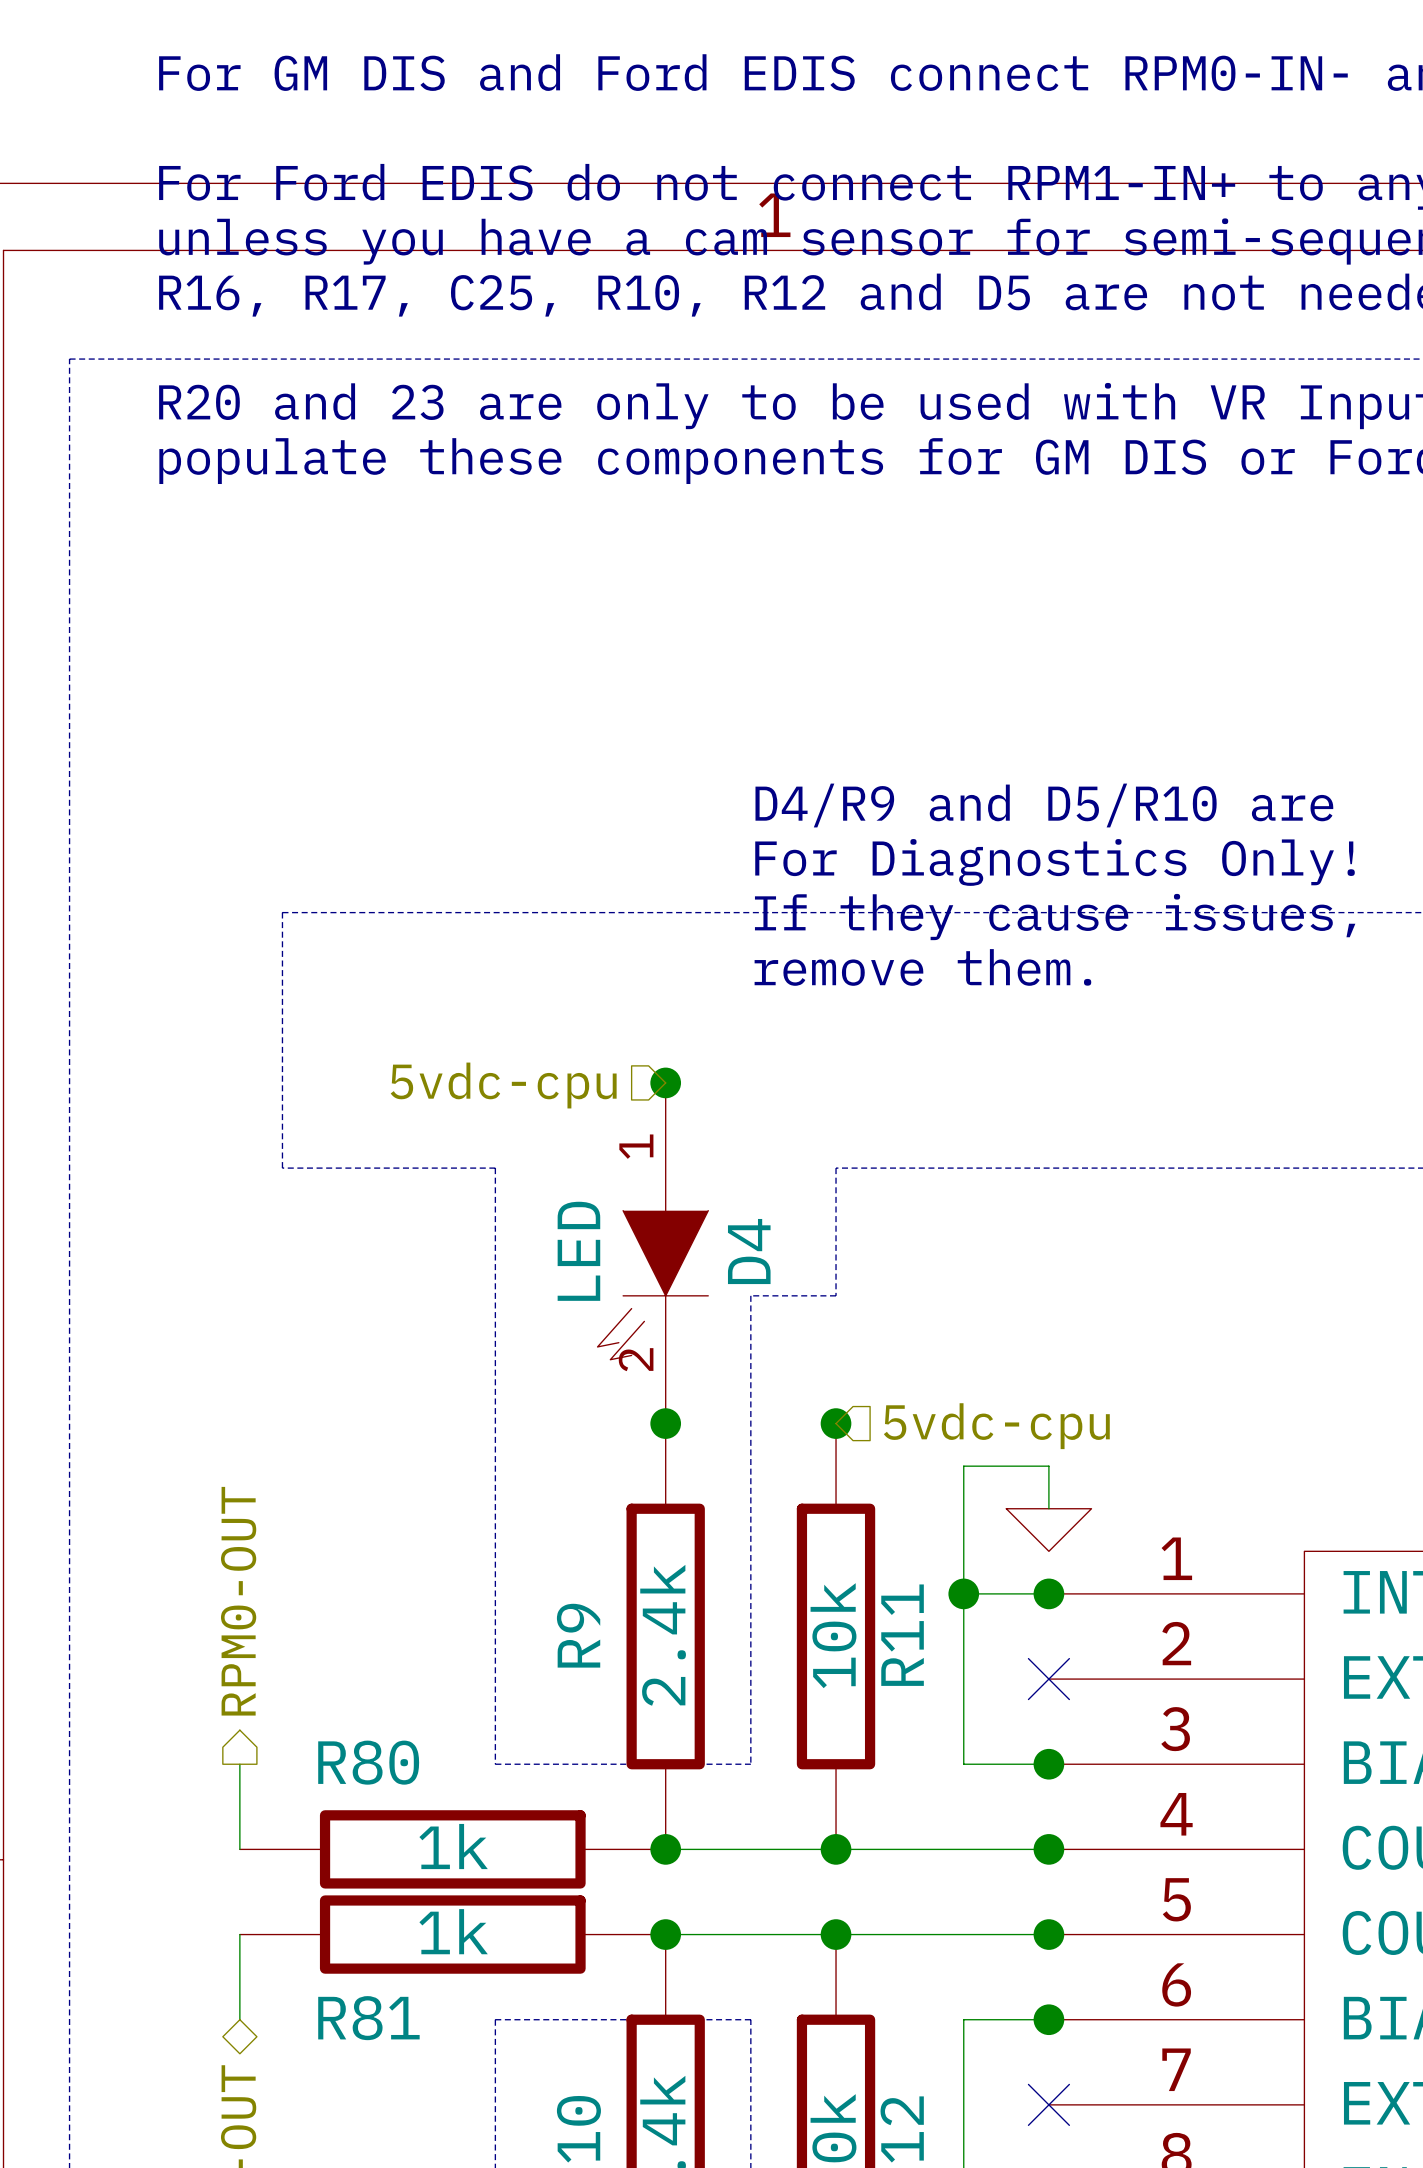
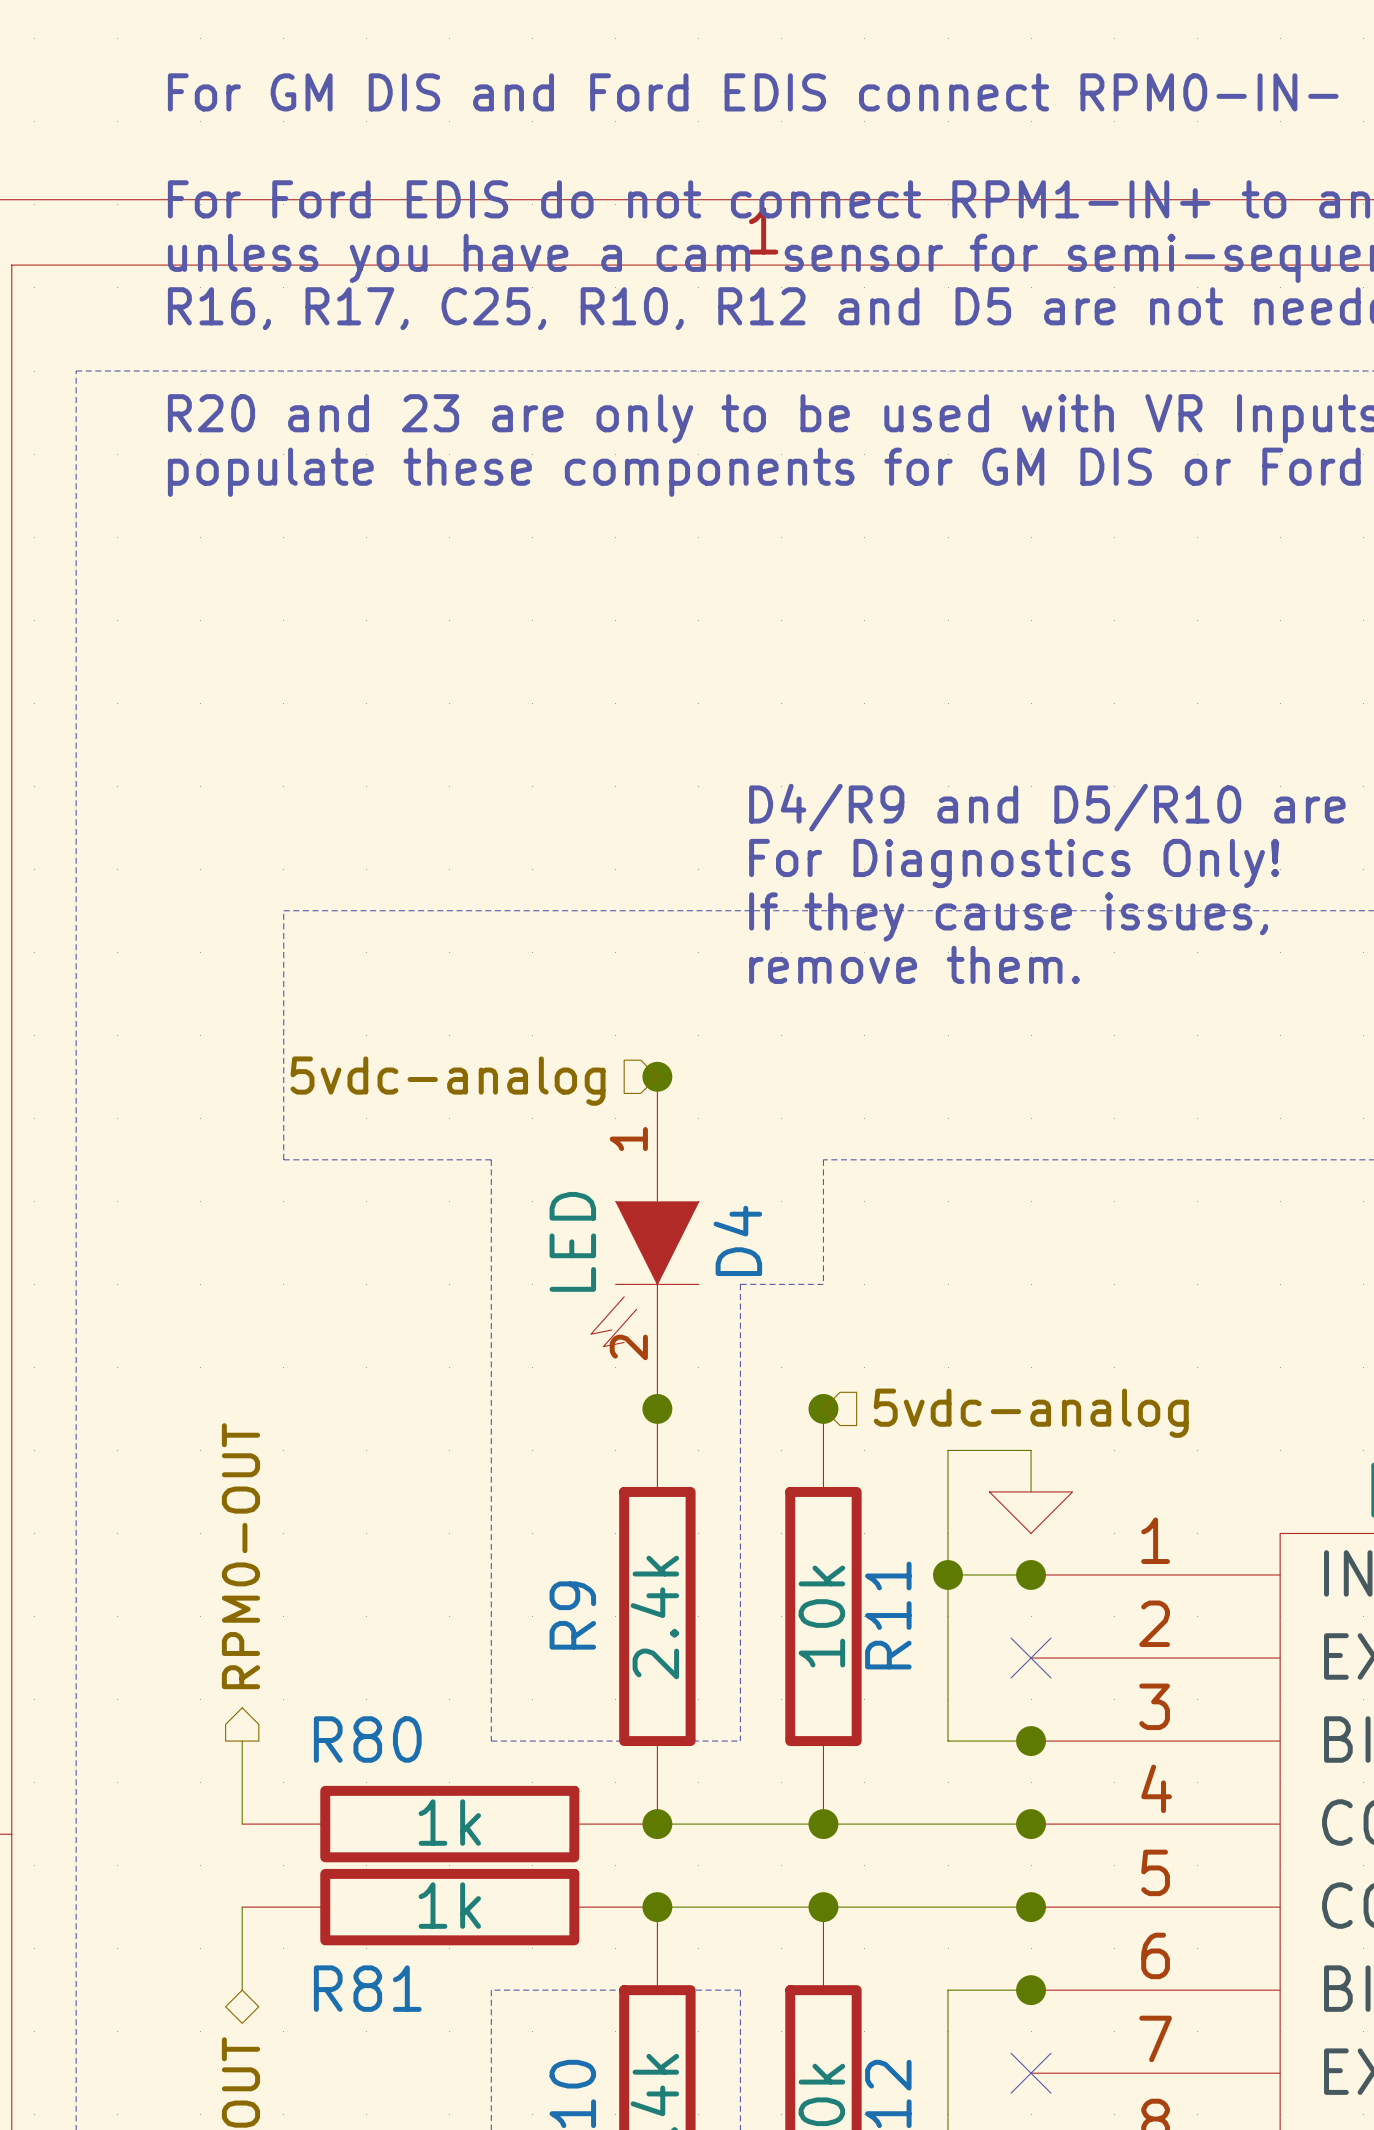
hierarchical label: 5vdc-cpu (503, 1085) -> 5vdc-analog (448, 1081)
hierarchical label: 5vdc-cpu (996, 1426) -> 5vdc-analog (1031, 1413)

